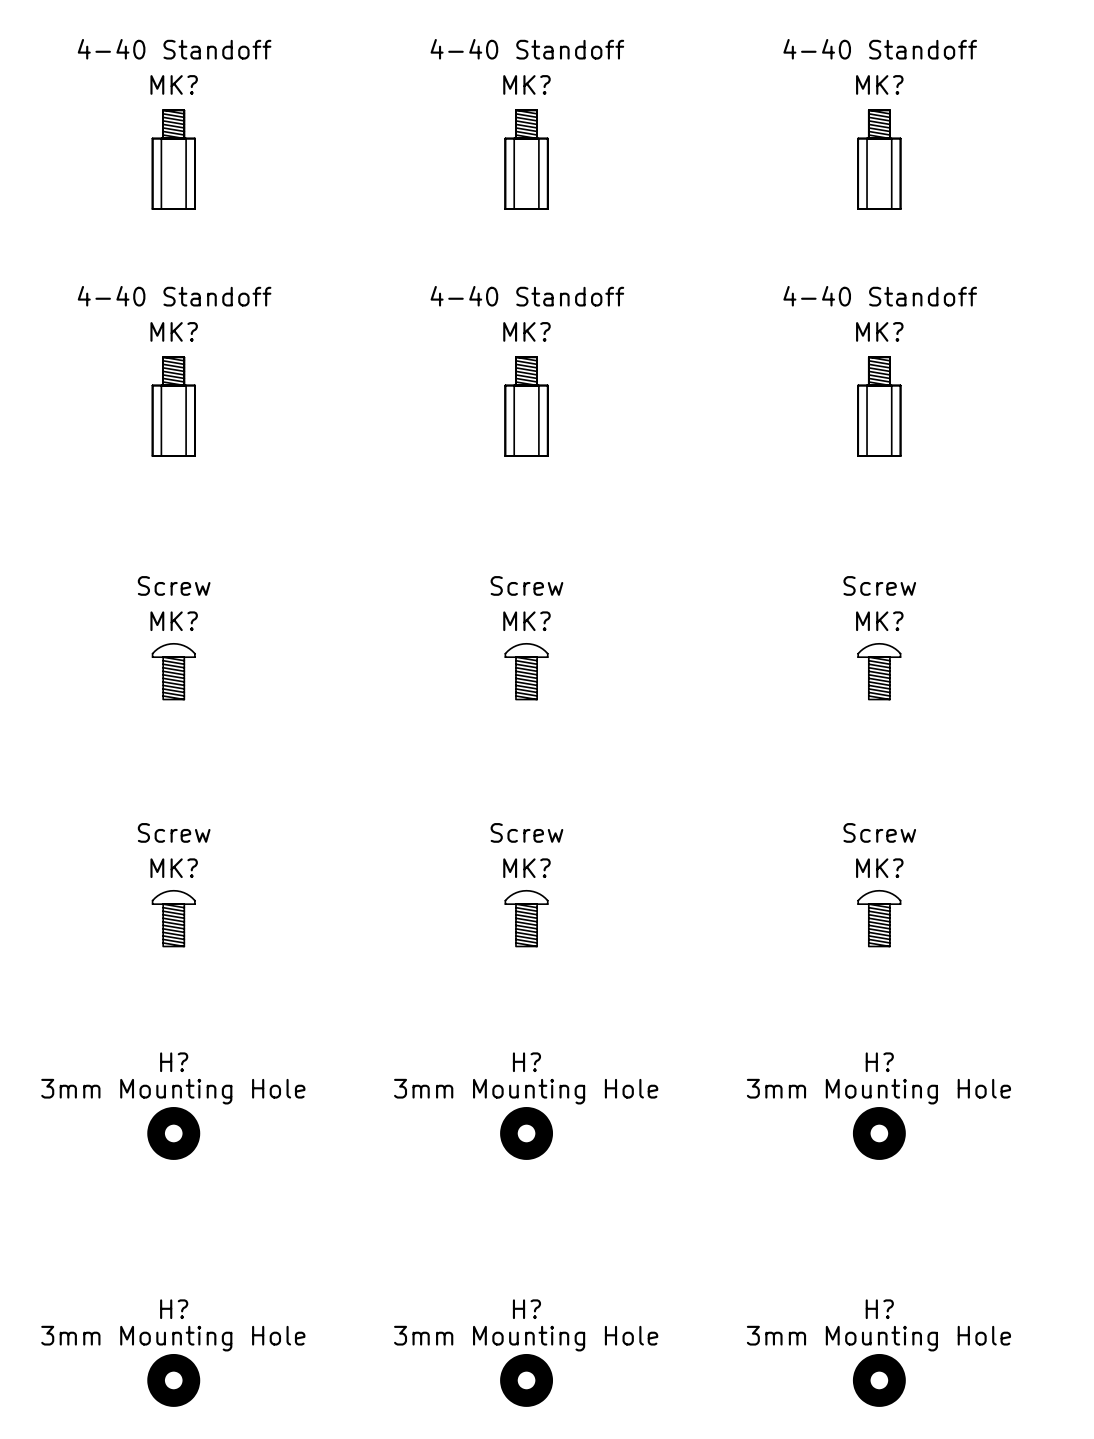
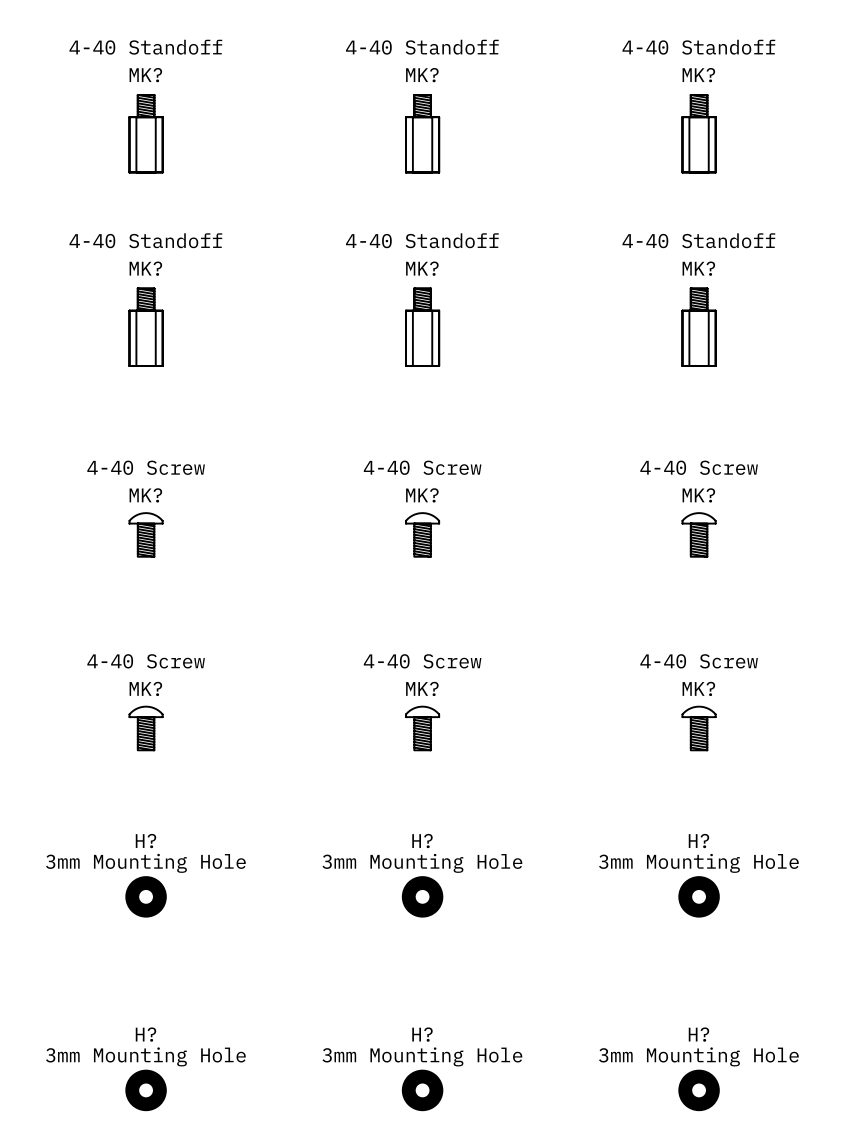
MK? value: Screw (174, 585) -> 4-40 Screw (146, 467)
MK? value: Screw (526, 585) -> 4-40 Screw (422, 467)
MK? value: Screw (879, 585) -> 4-40 Screw (699, 467)
MK? value: Screw (174, 832) -> 4-40 Screw (146, 661)
MK? value: Screw (526, 832) -> 4-40 Screw (422, 661)
MK? value: Screw (879, 832) -> 4-40 Screw (699, 661)

